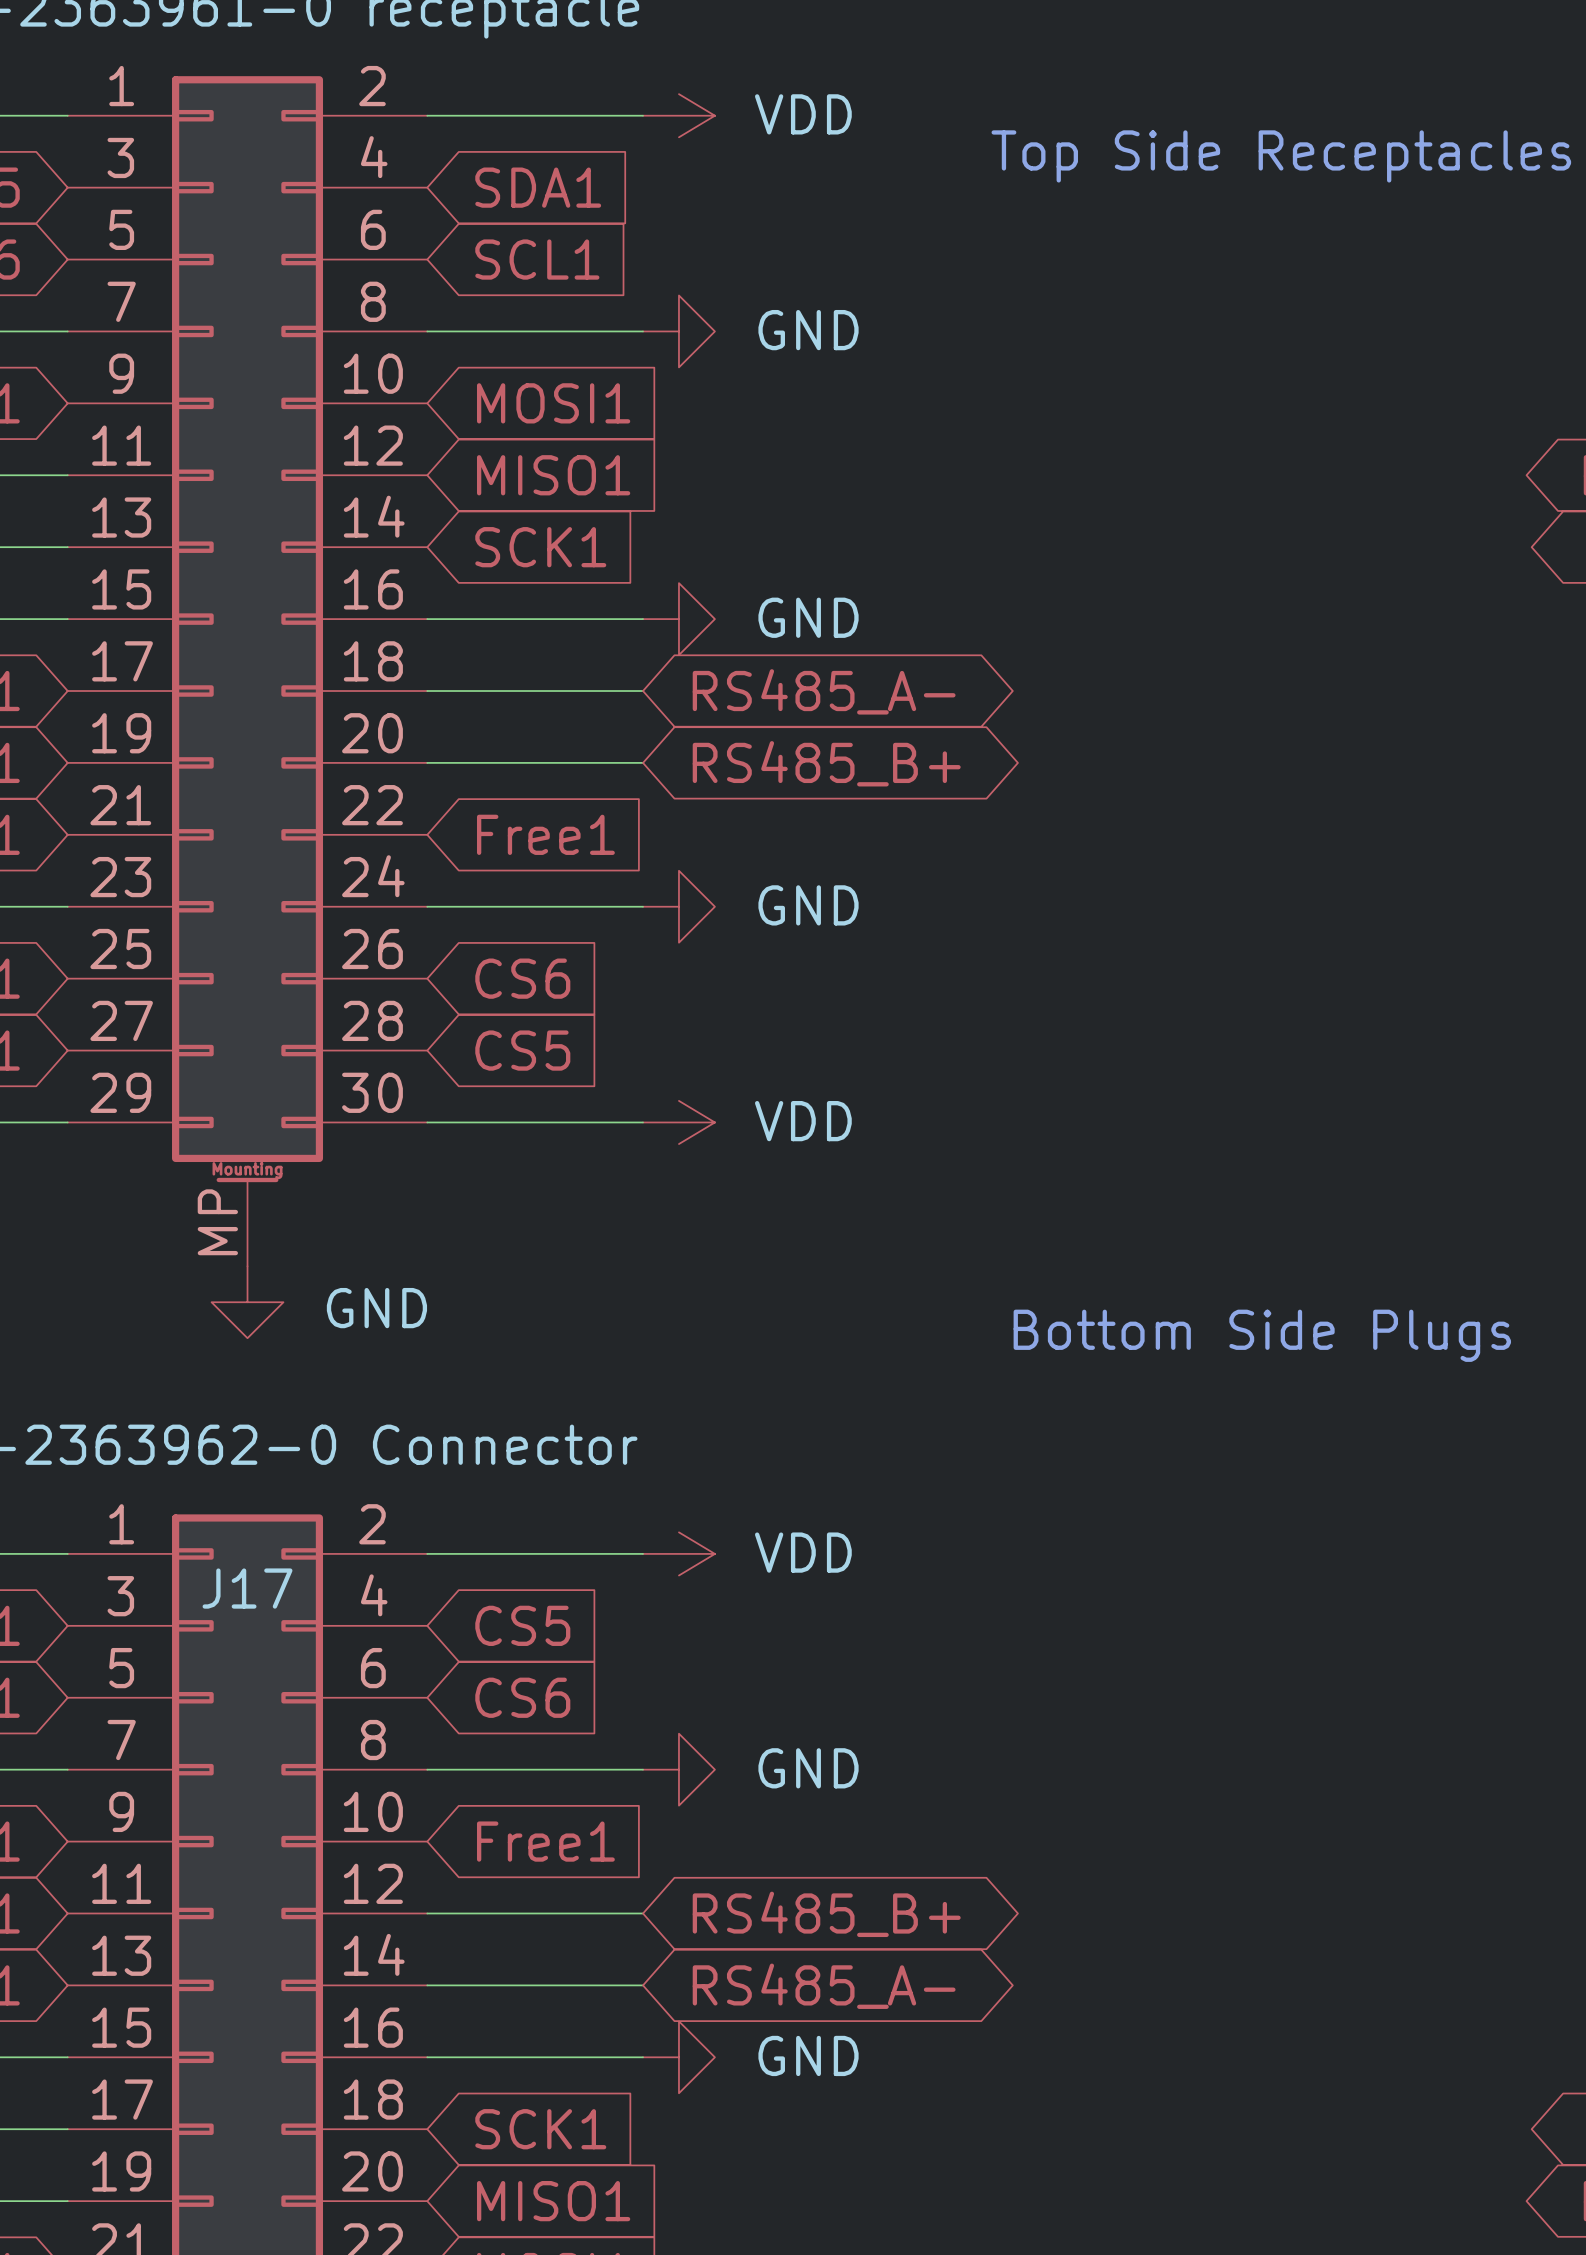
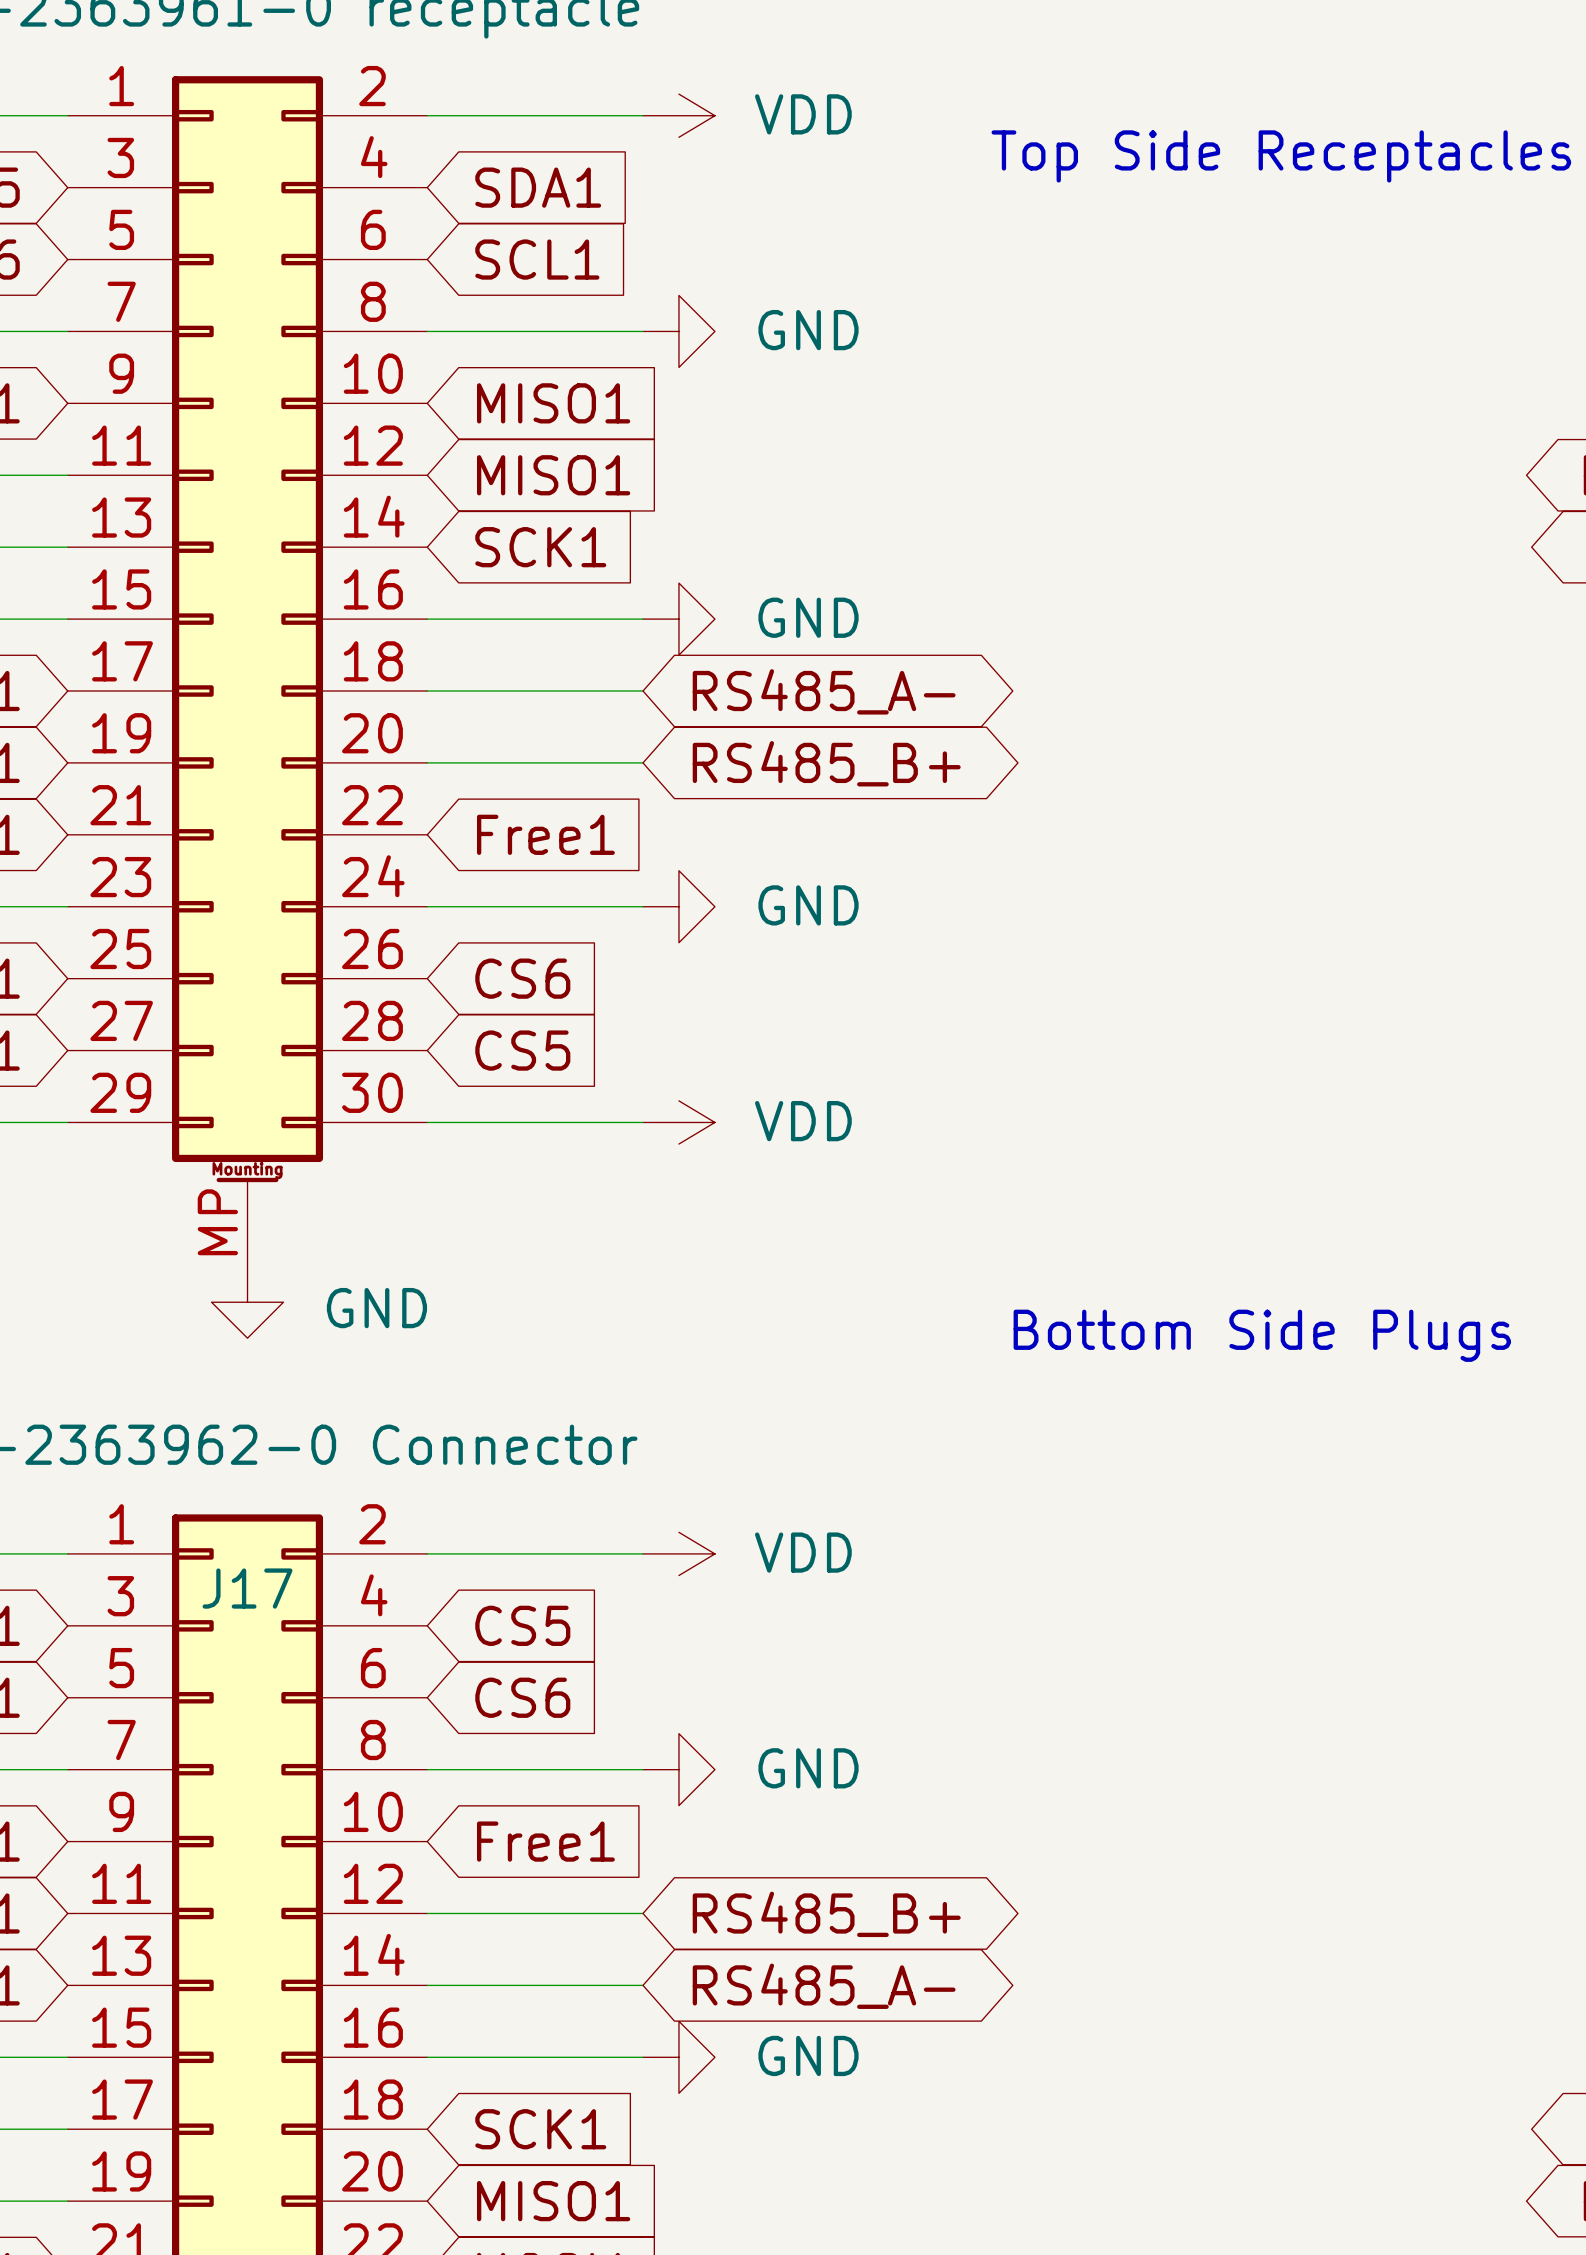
global label: MOSI1 (553, 403) -> MISO1 (553, 403)

